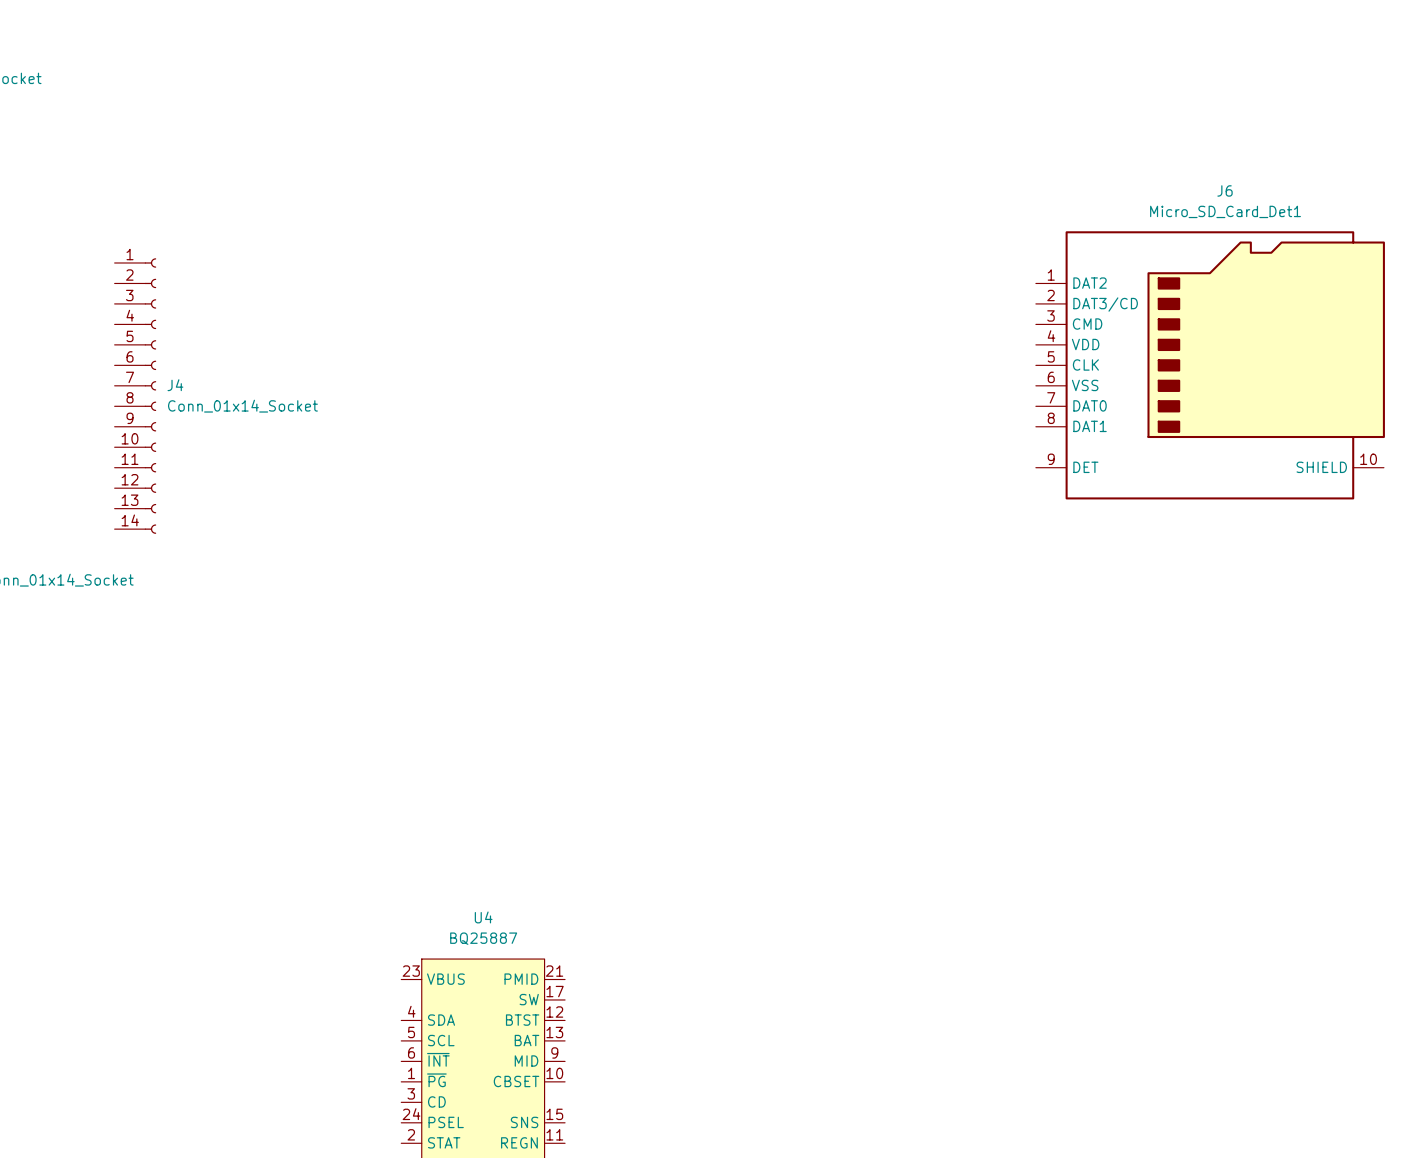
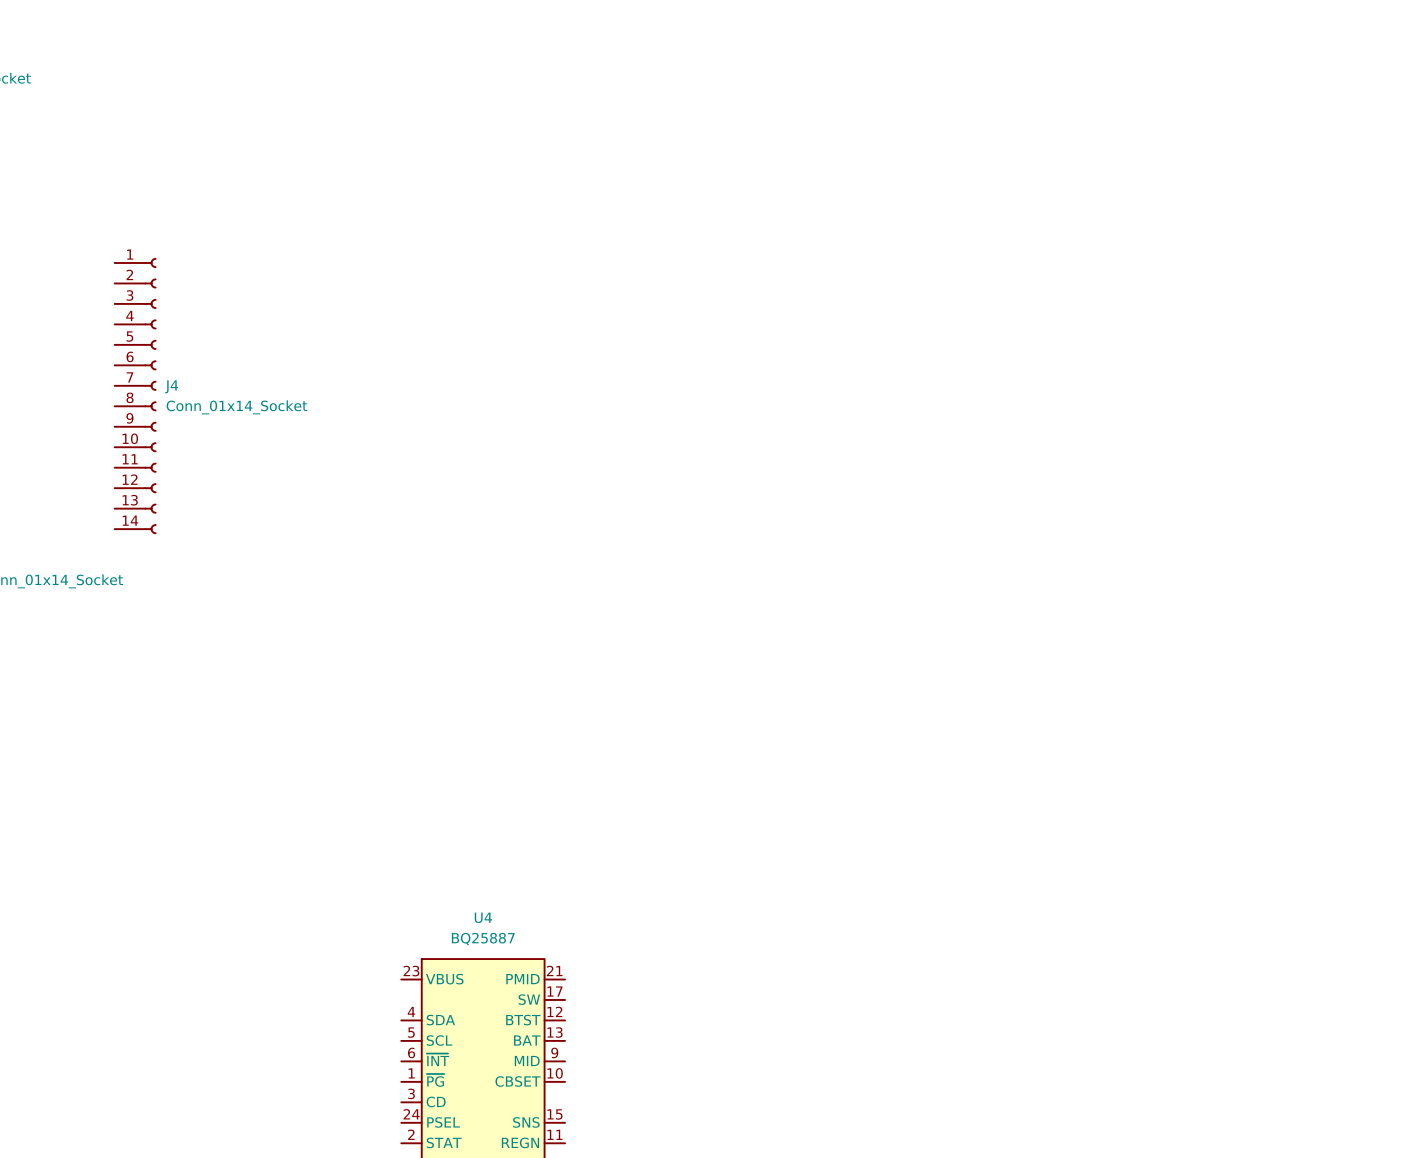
J6: Micro_SD_Card_Det1 (1210, 365) -> none

